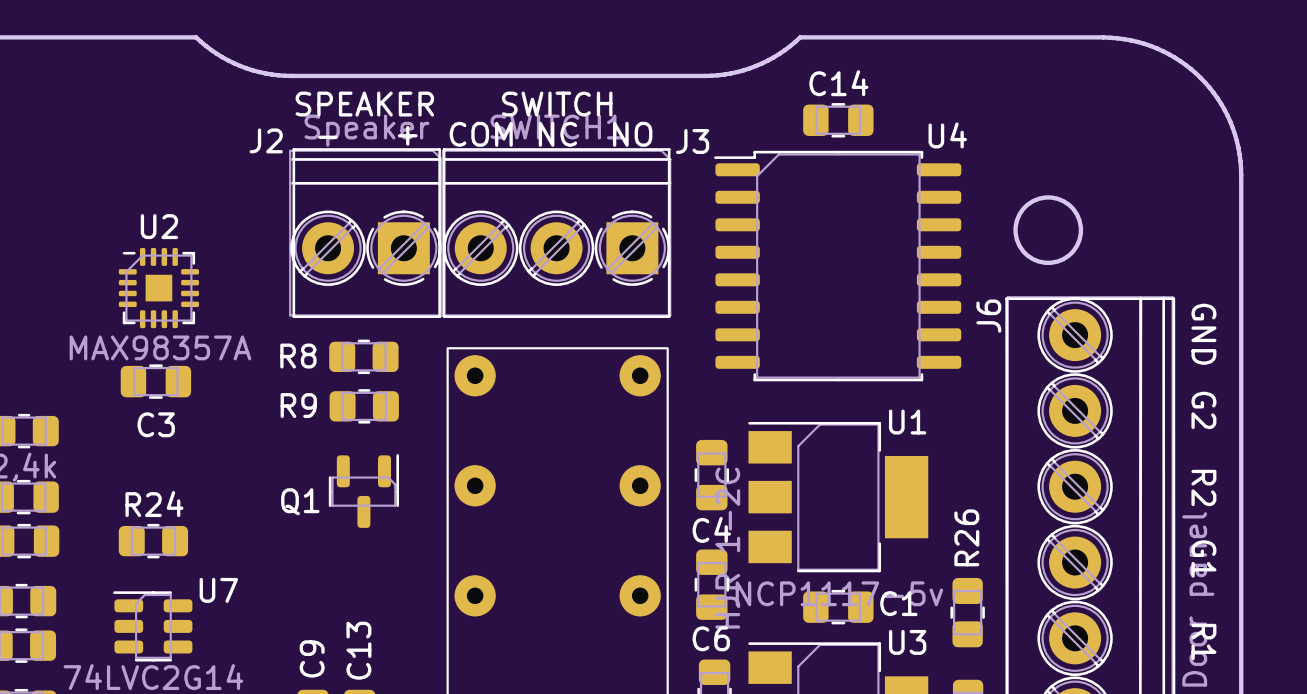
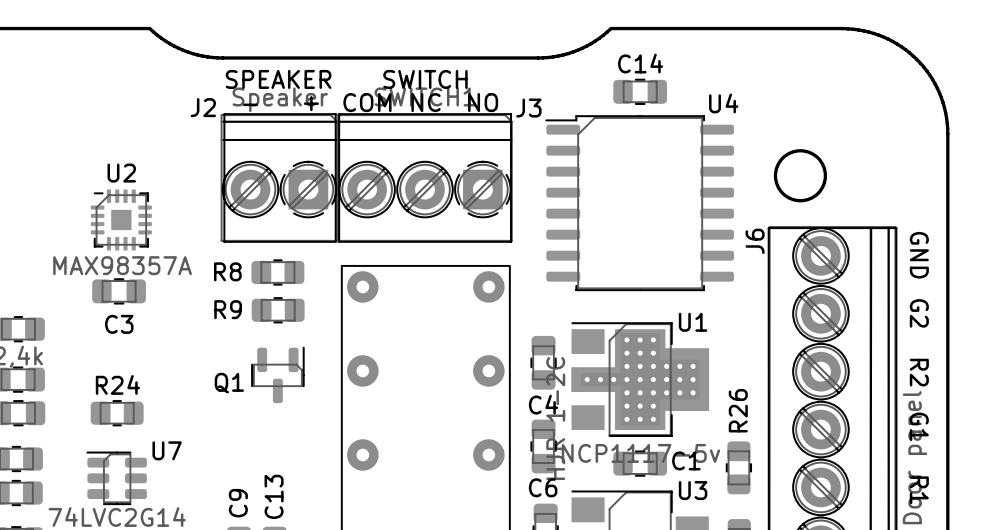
U1 footprint: [748, 421, 929, 573] -> [571, 322, 710, 437]

